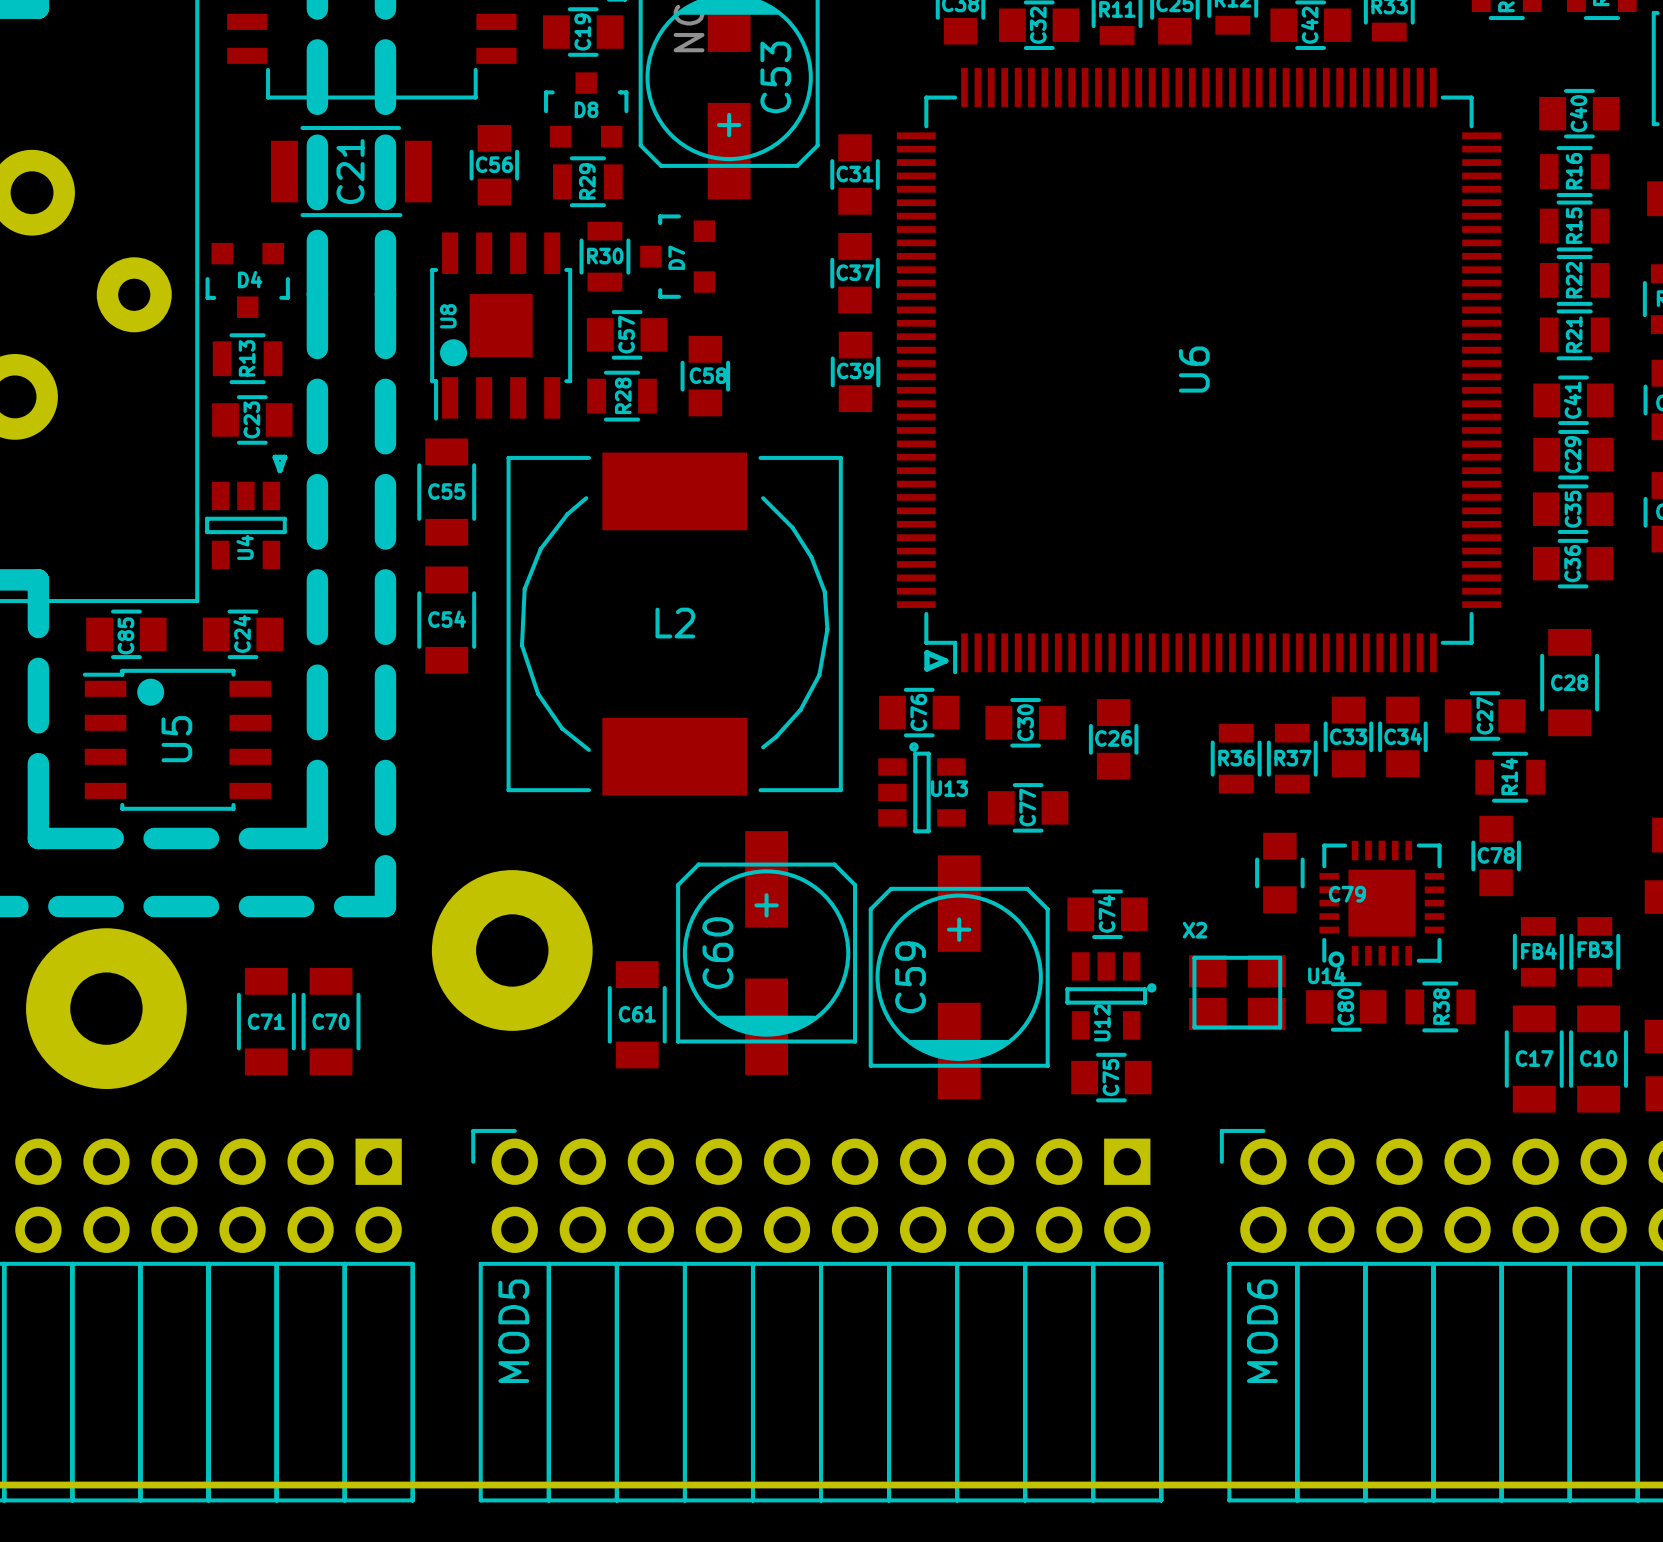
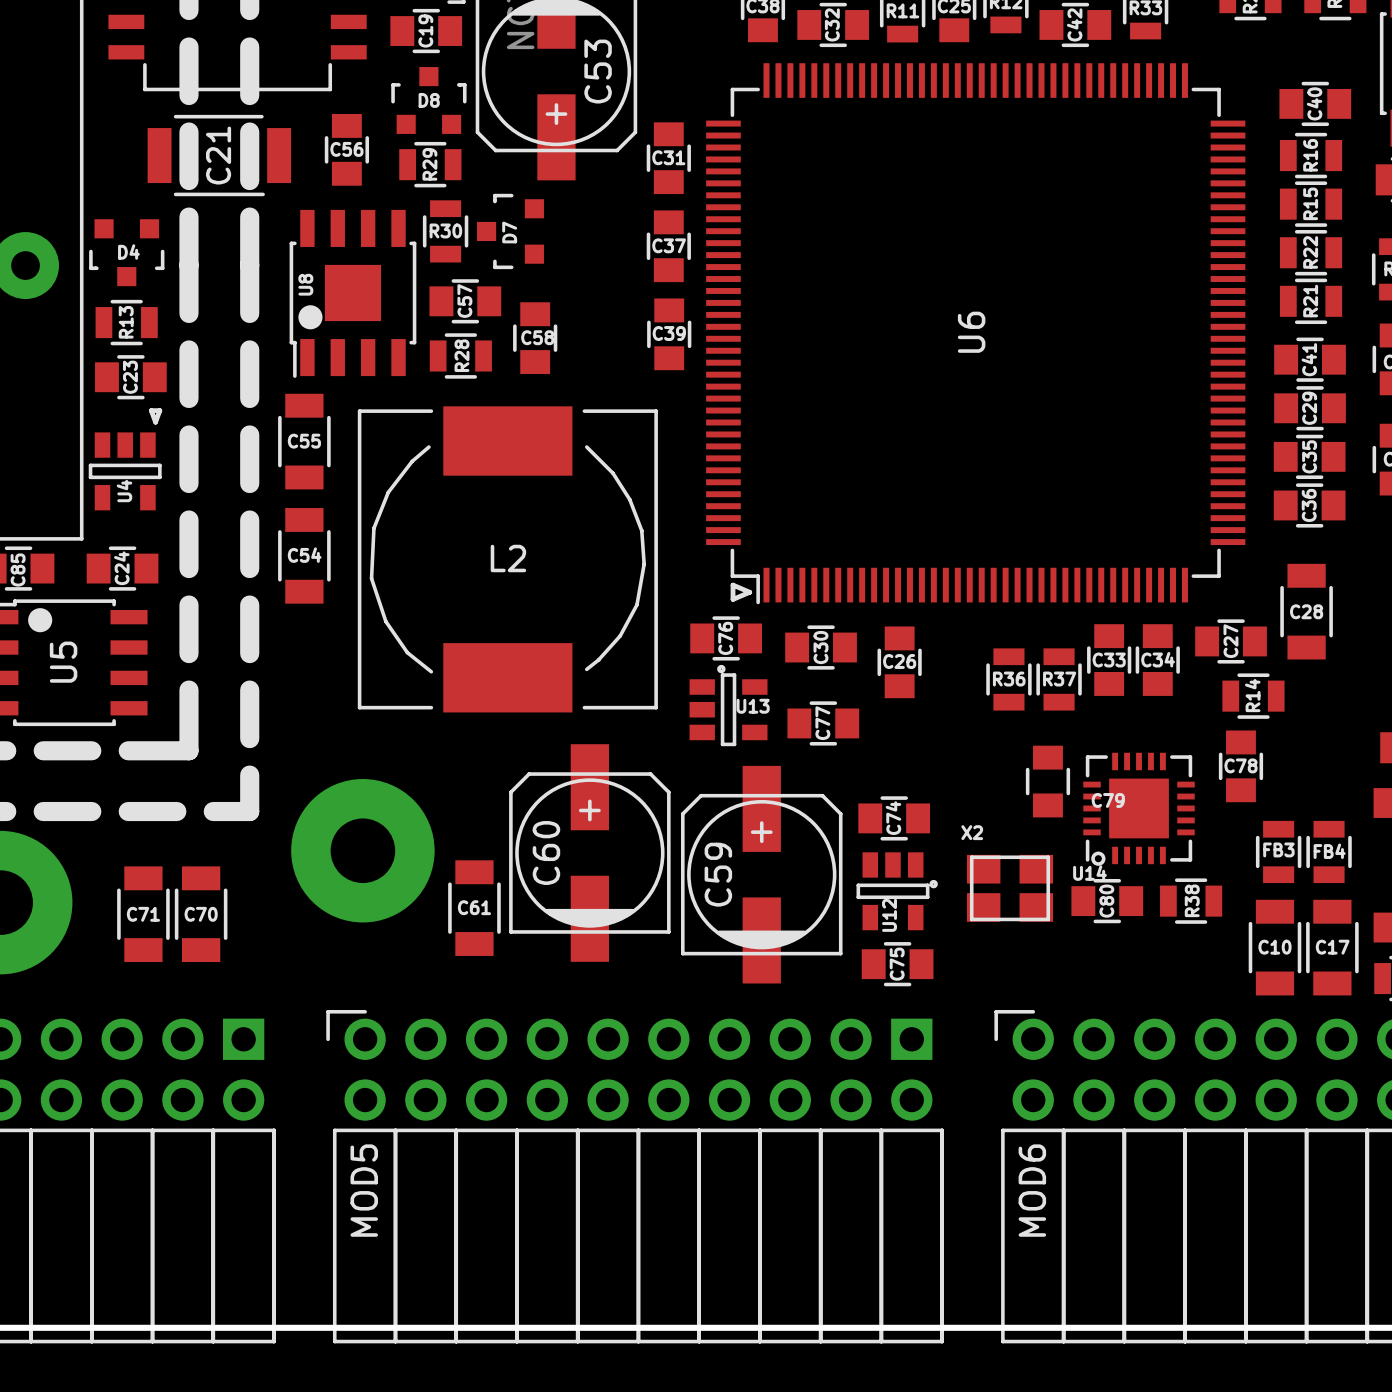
FB3 name: FB3 (1595, 949) -> FB4 (1329, 851)
FB4 name: FB4 (1538, 951) -> FB3 (1278, 849)
C17 name: C17 (1534, 1058) -> C10 (1274, 947)
C10 name: C10 (1598, 1058) -> C17 (1332, 947)

